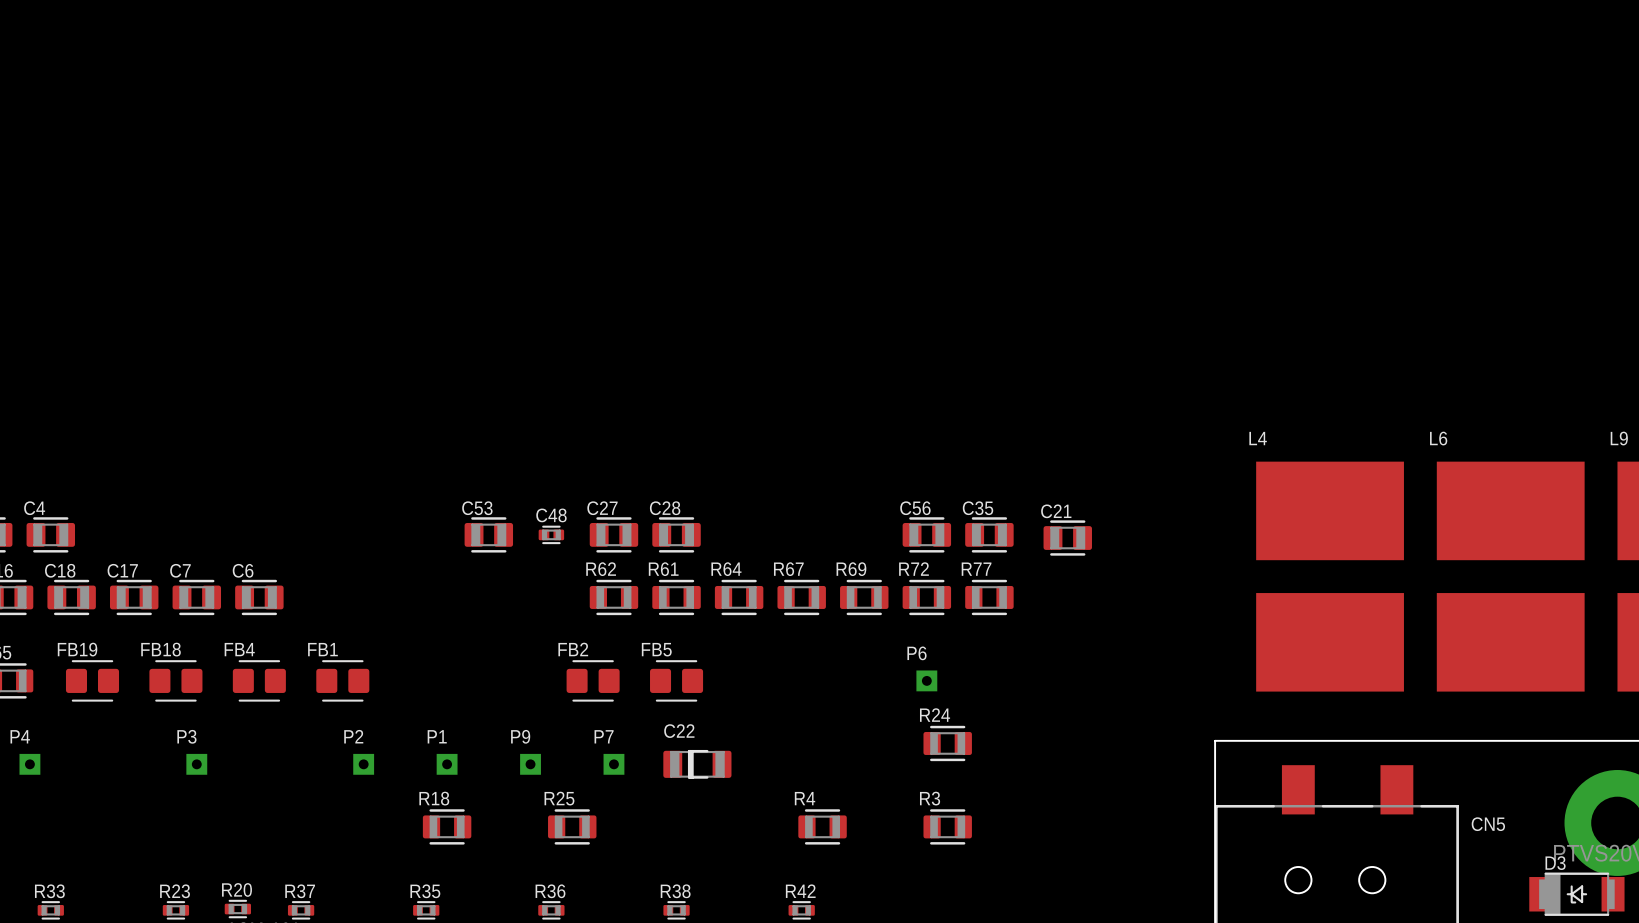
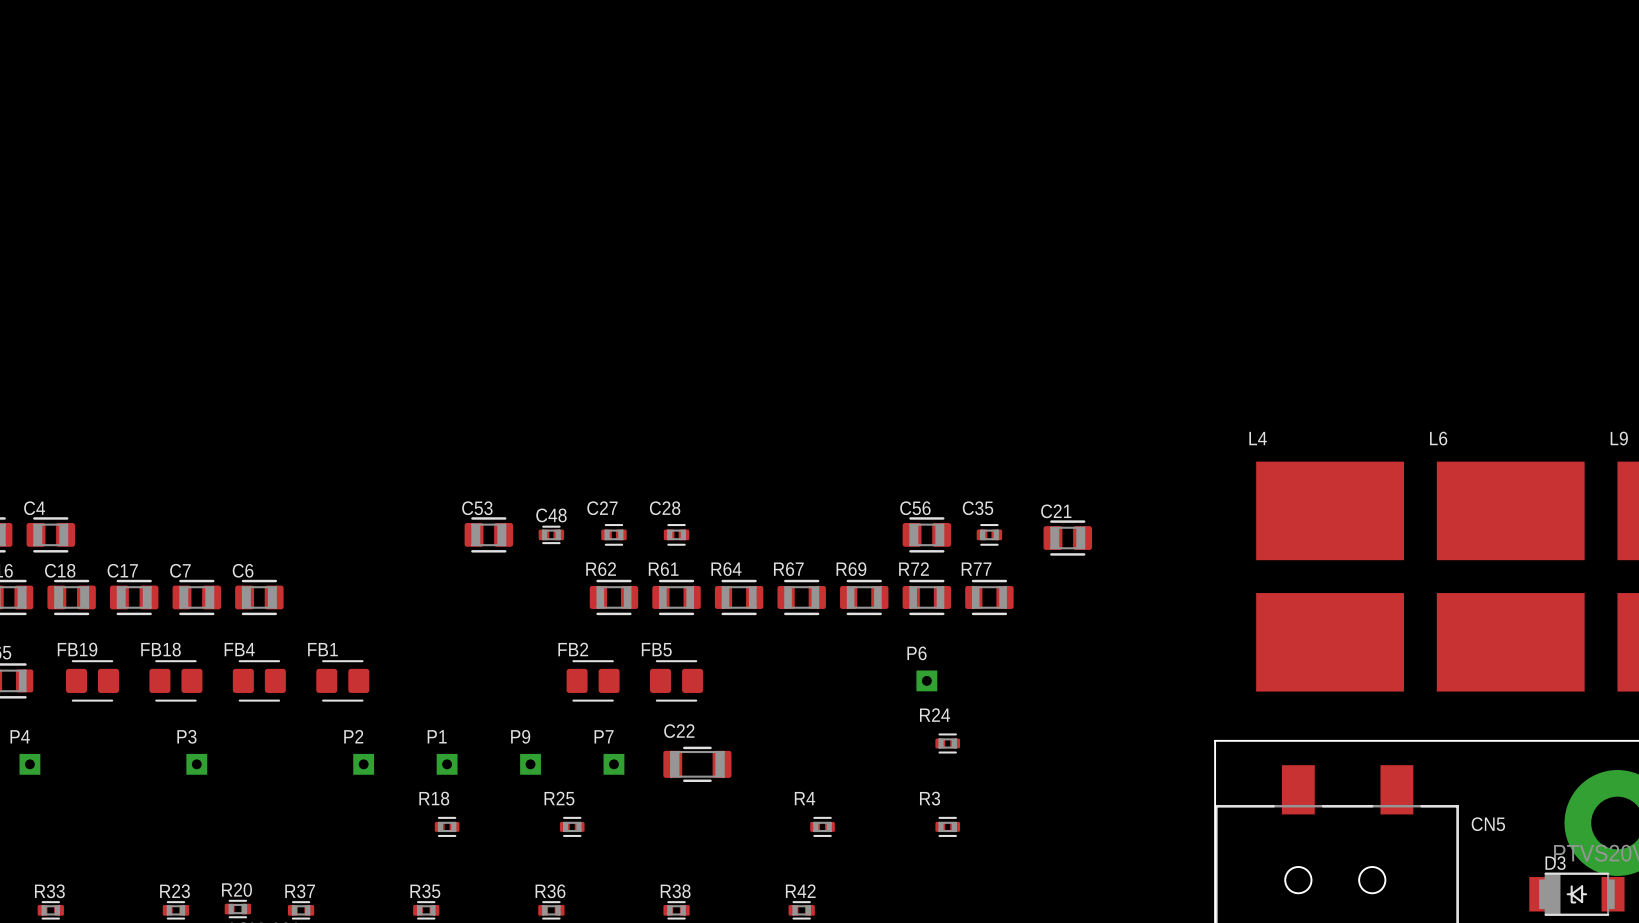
C27 footprint: [589, 517, 639, 553] -> [601, 524, 627, 546]
C28 footprint: [652, 517, 701, 553] -> [663, 524, 690, 546]
C35 footprint: [965, 517, 1014, 553] -> [976, 524, 1003, 546]
R24 footprint: [923, 725, 972, 762] -> [935, 733, 961, 754]
C22 footprint: [663, 749, 732, 779] -> [663, 746, 732, 782]
R18 footprint: [422, 809, 472, 845] -> [434, 816, 460, 837]
R25 footprint: [548, 809, 597, 845] -> [559, 816, 585, 837]
R4 footprint: [798, 809, 847, 845] -> [810, 816, 835, 837]
R3 footprint: [923, 809, 972, 845] -> [935, 816, 961, 837]

